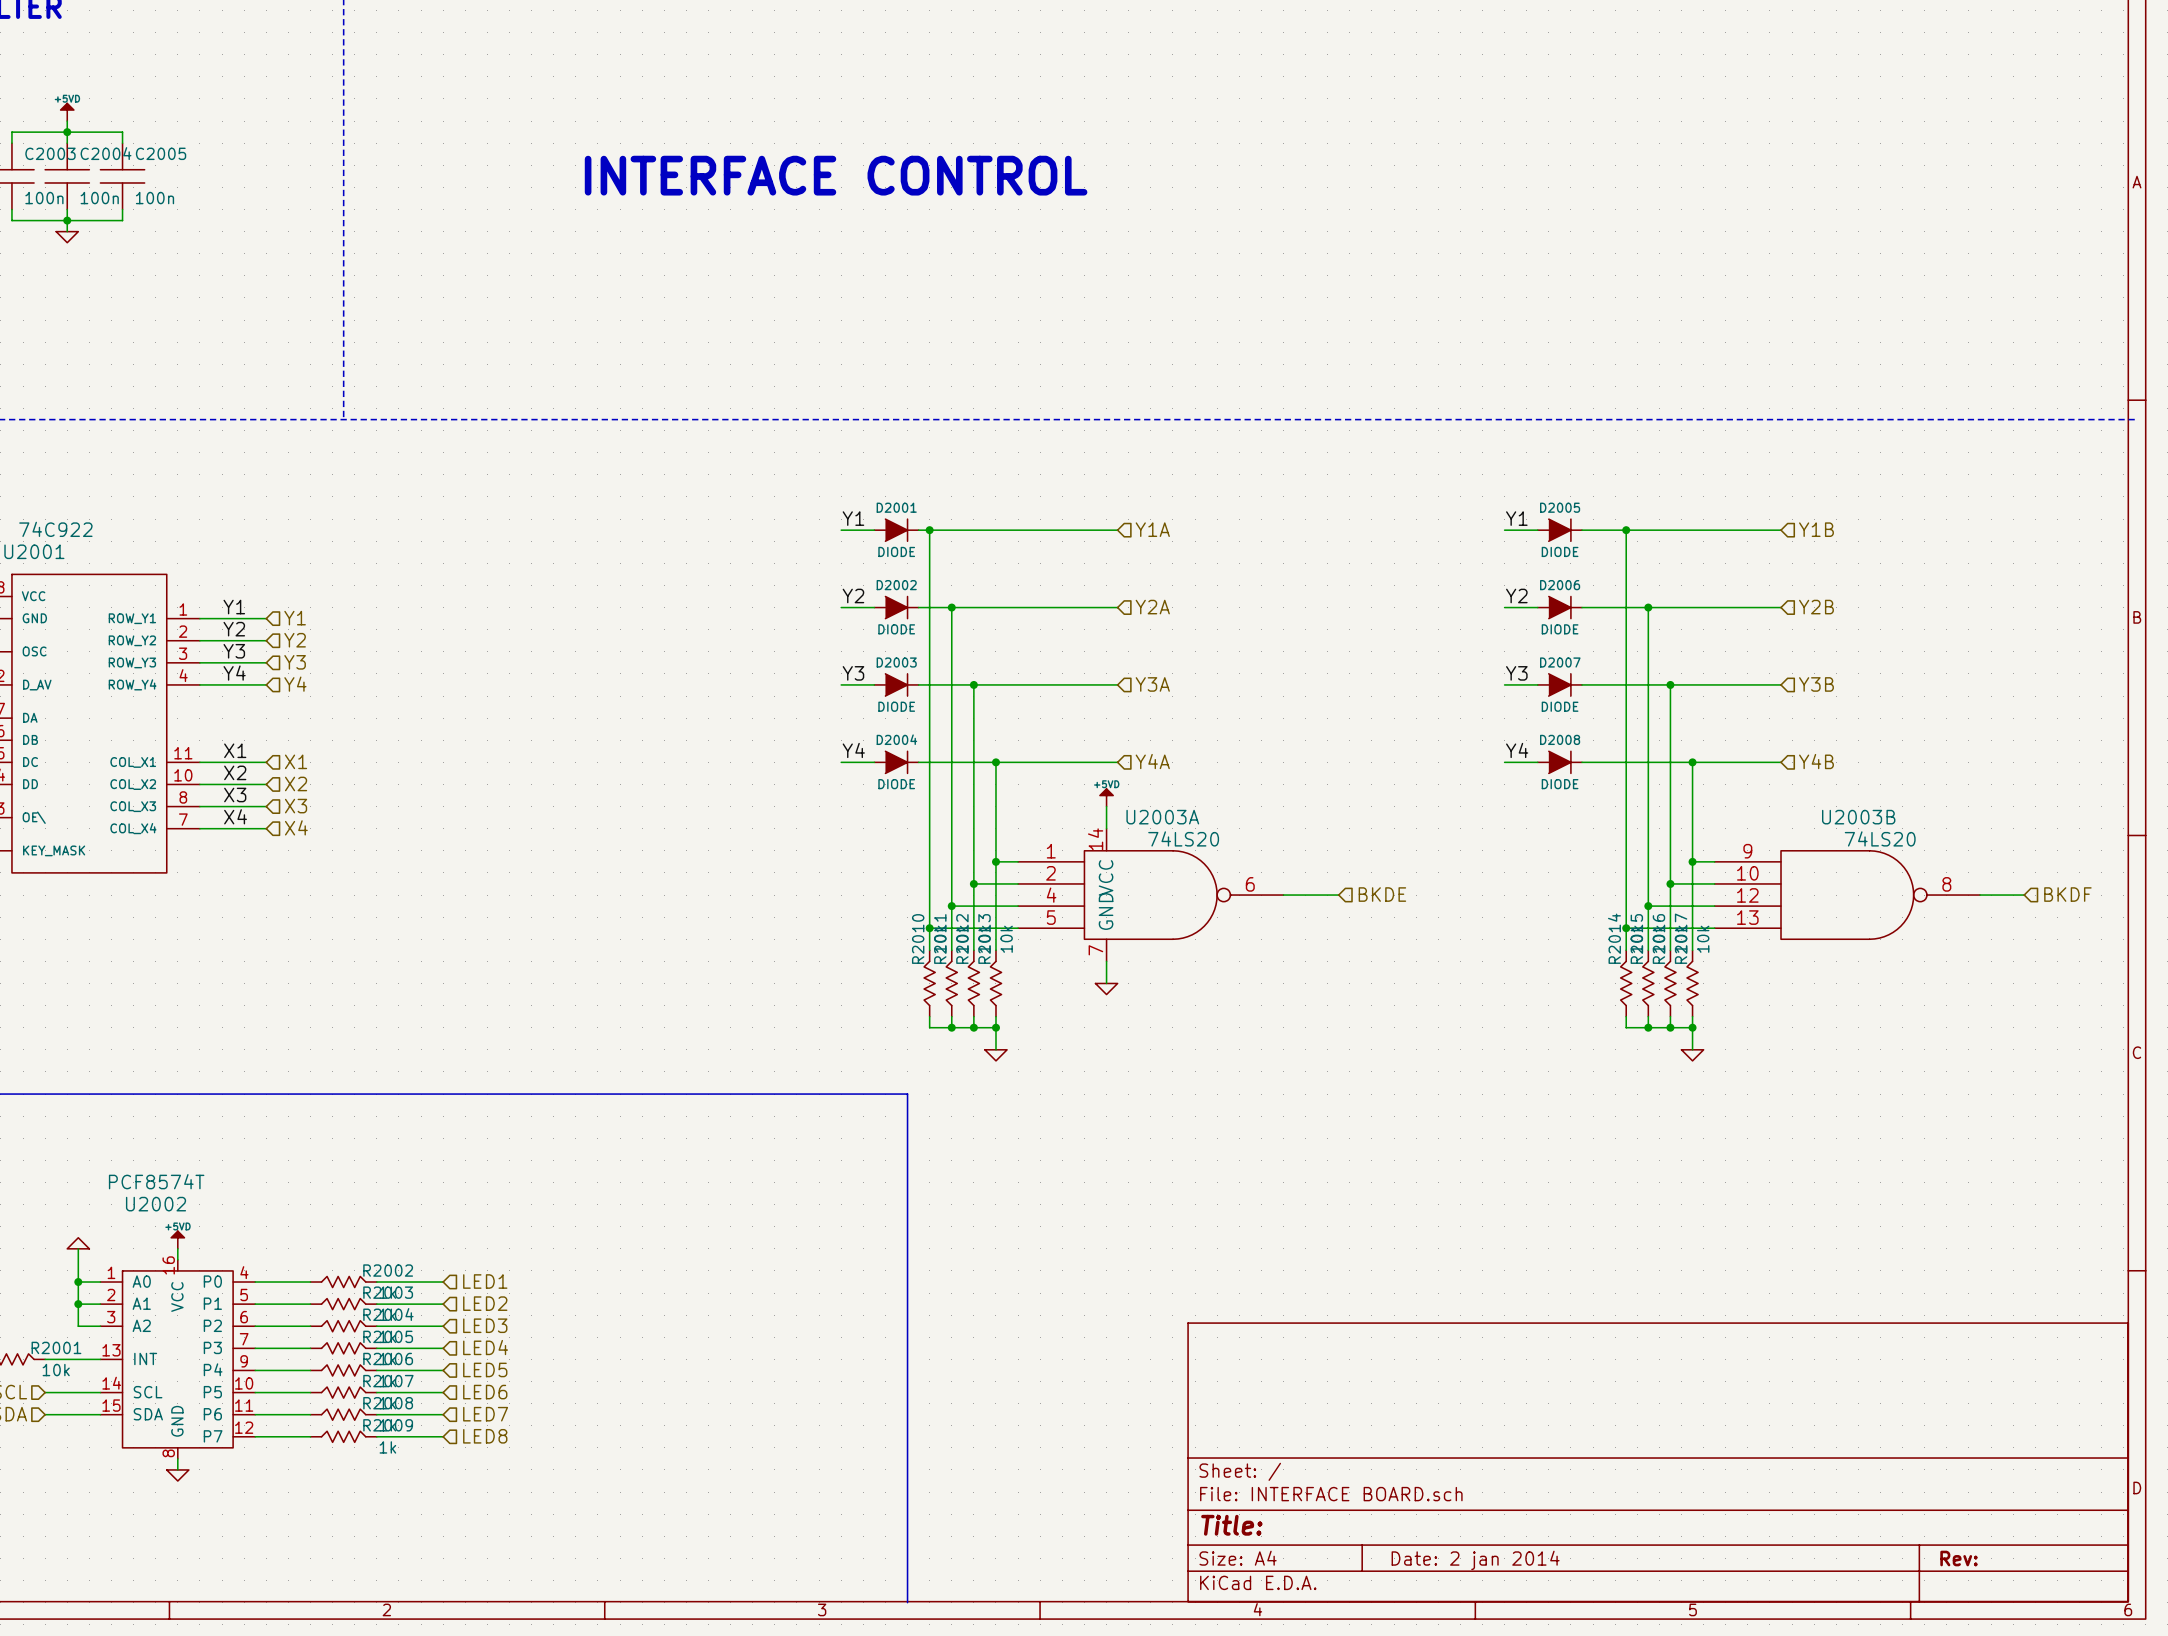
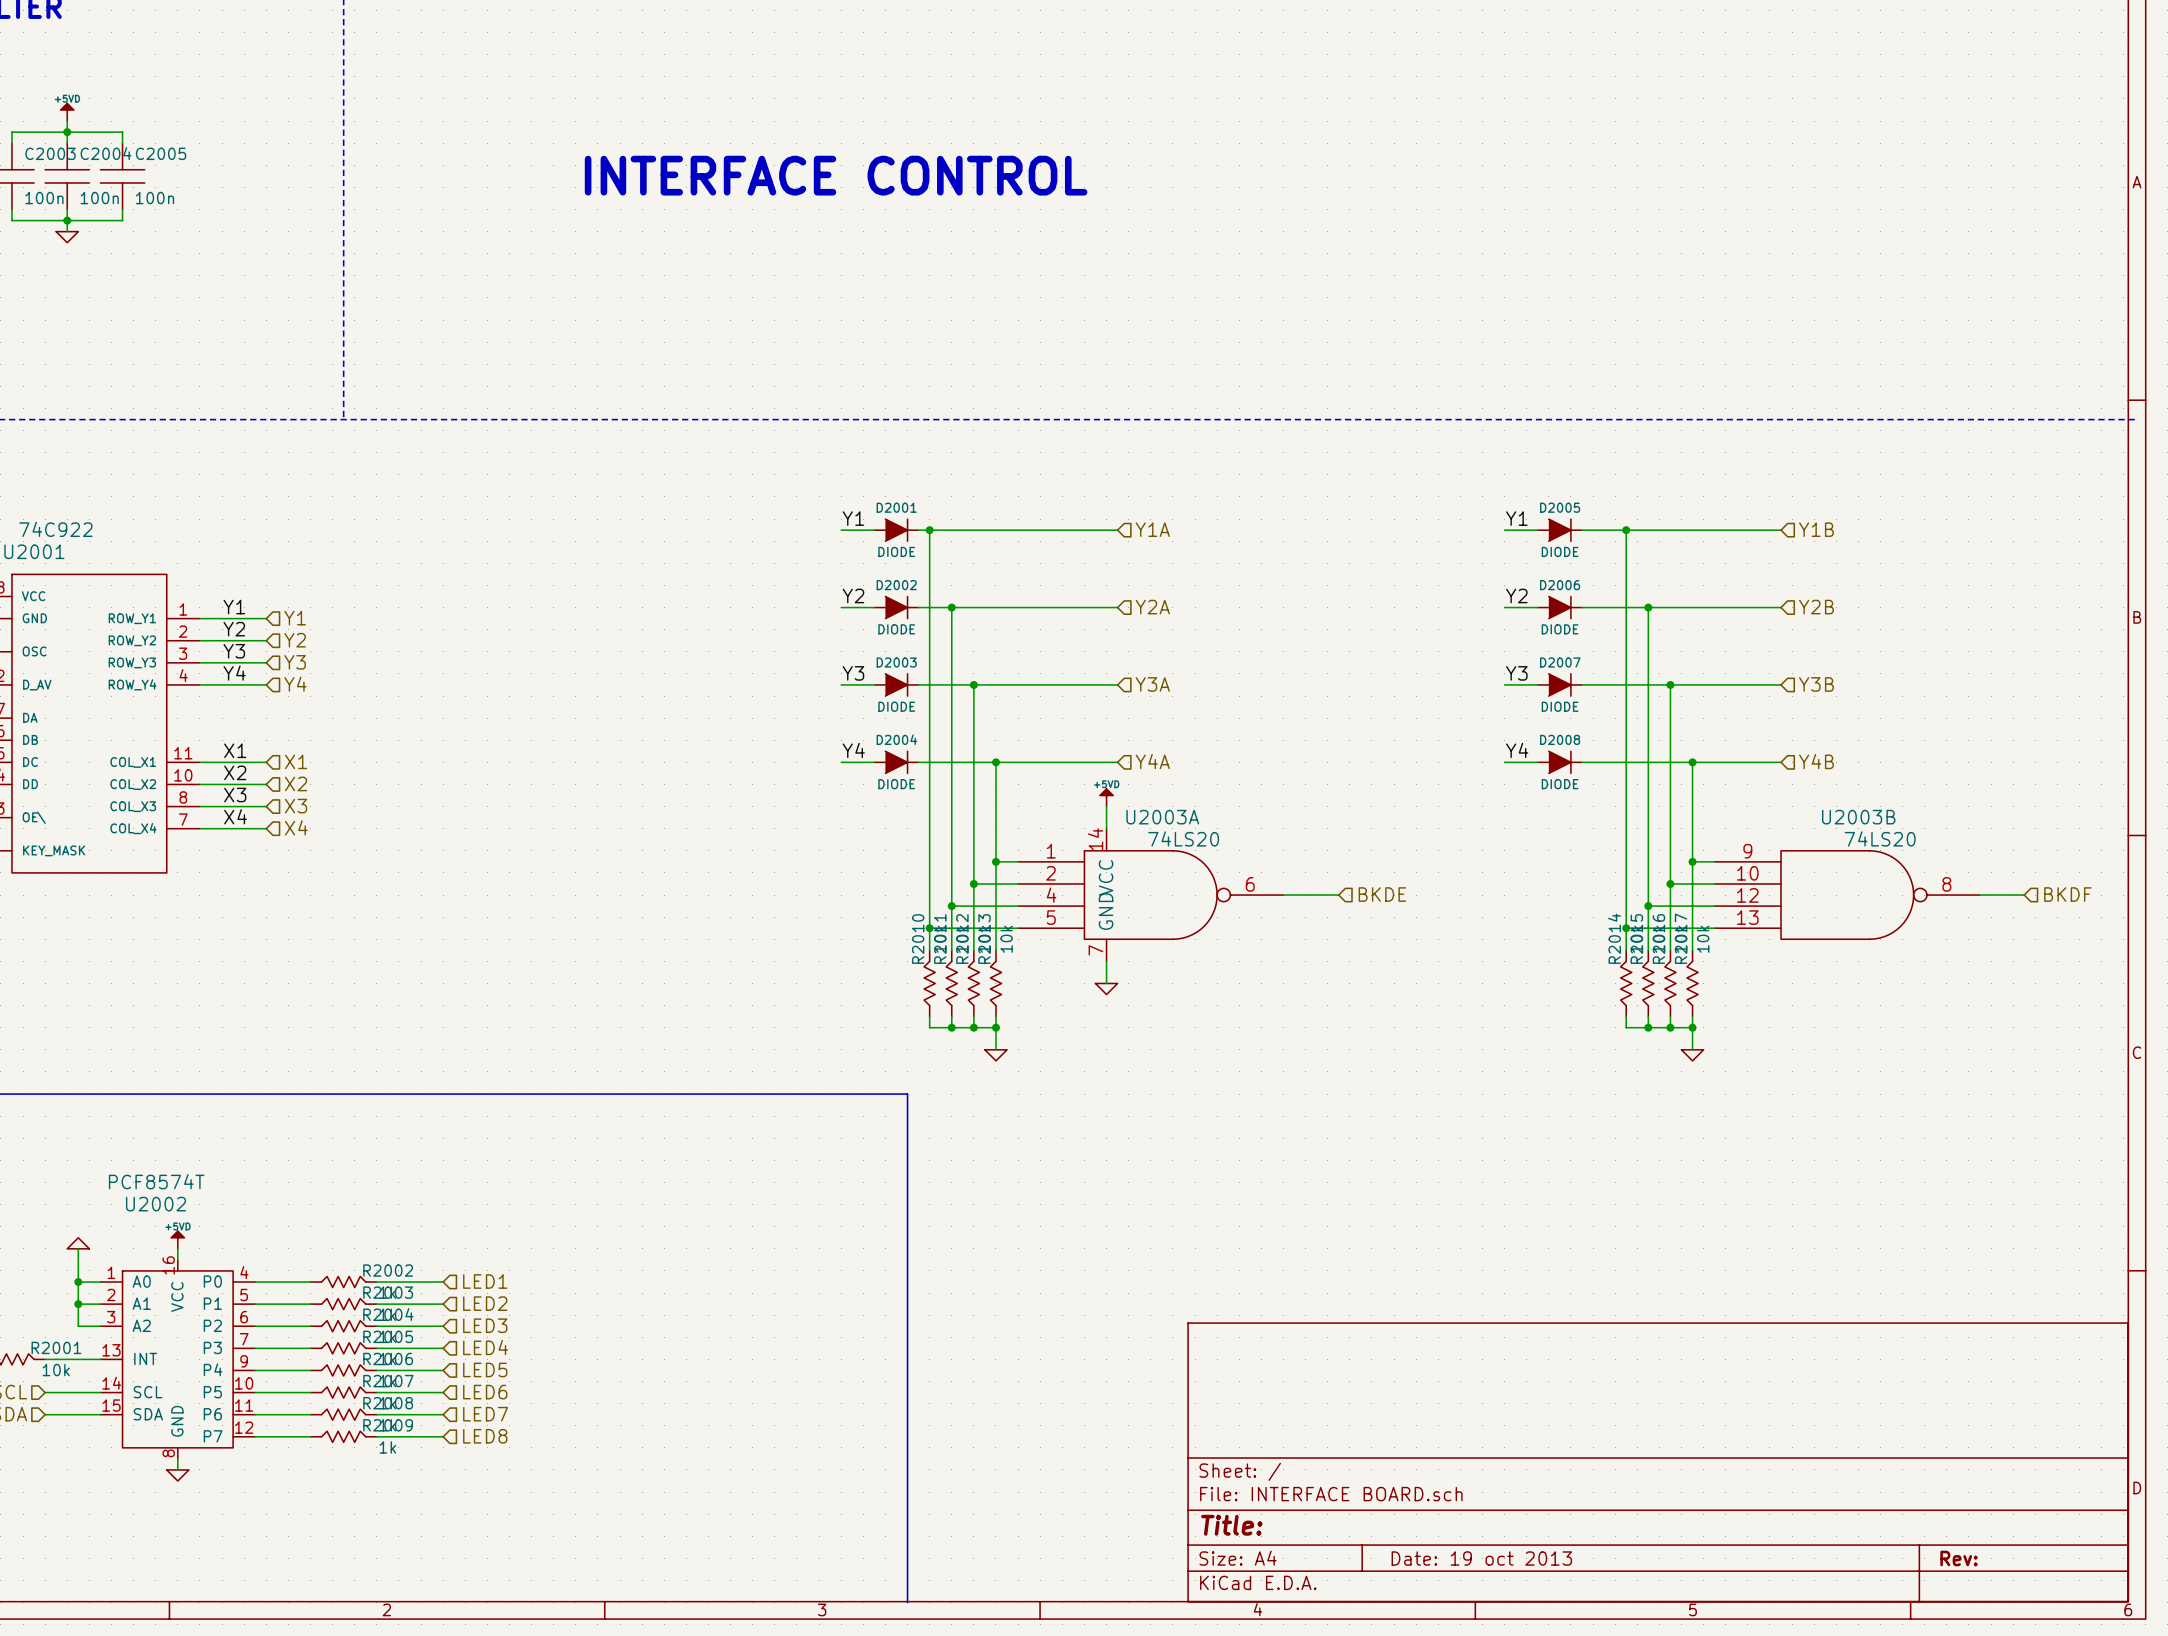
title block: Date: 2 jan 2014 (1475, 1560) -> Date: 19 oct 2013 (1481, 1558)

